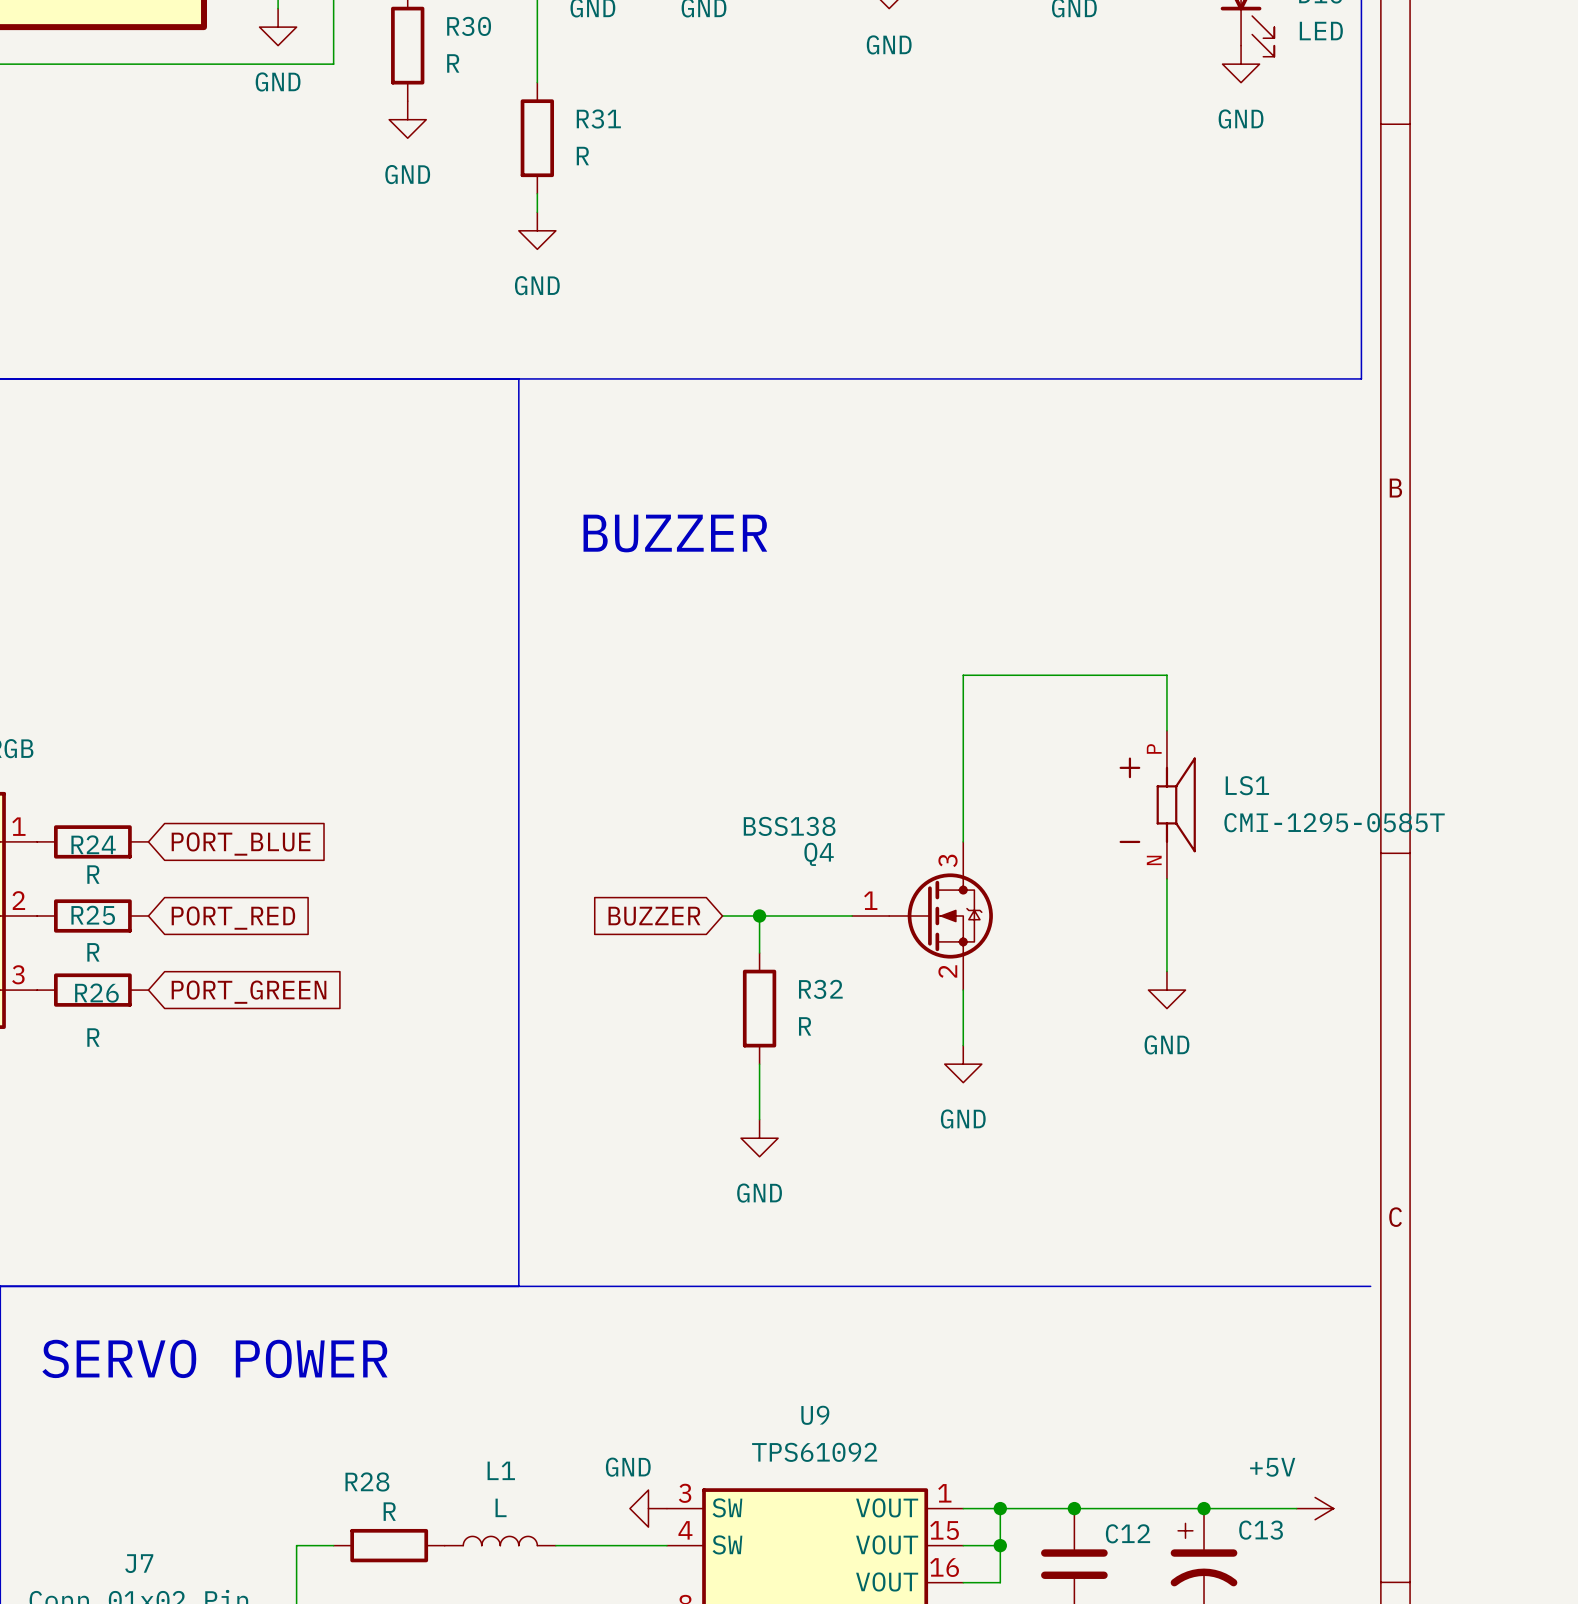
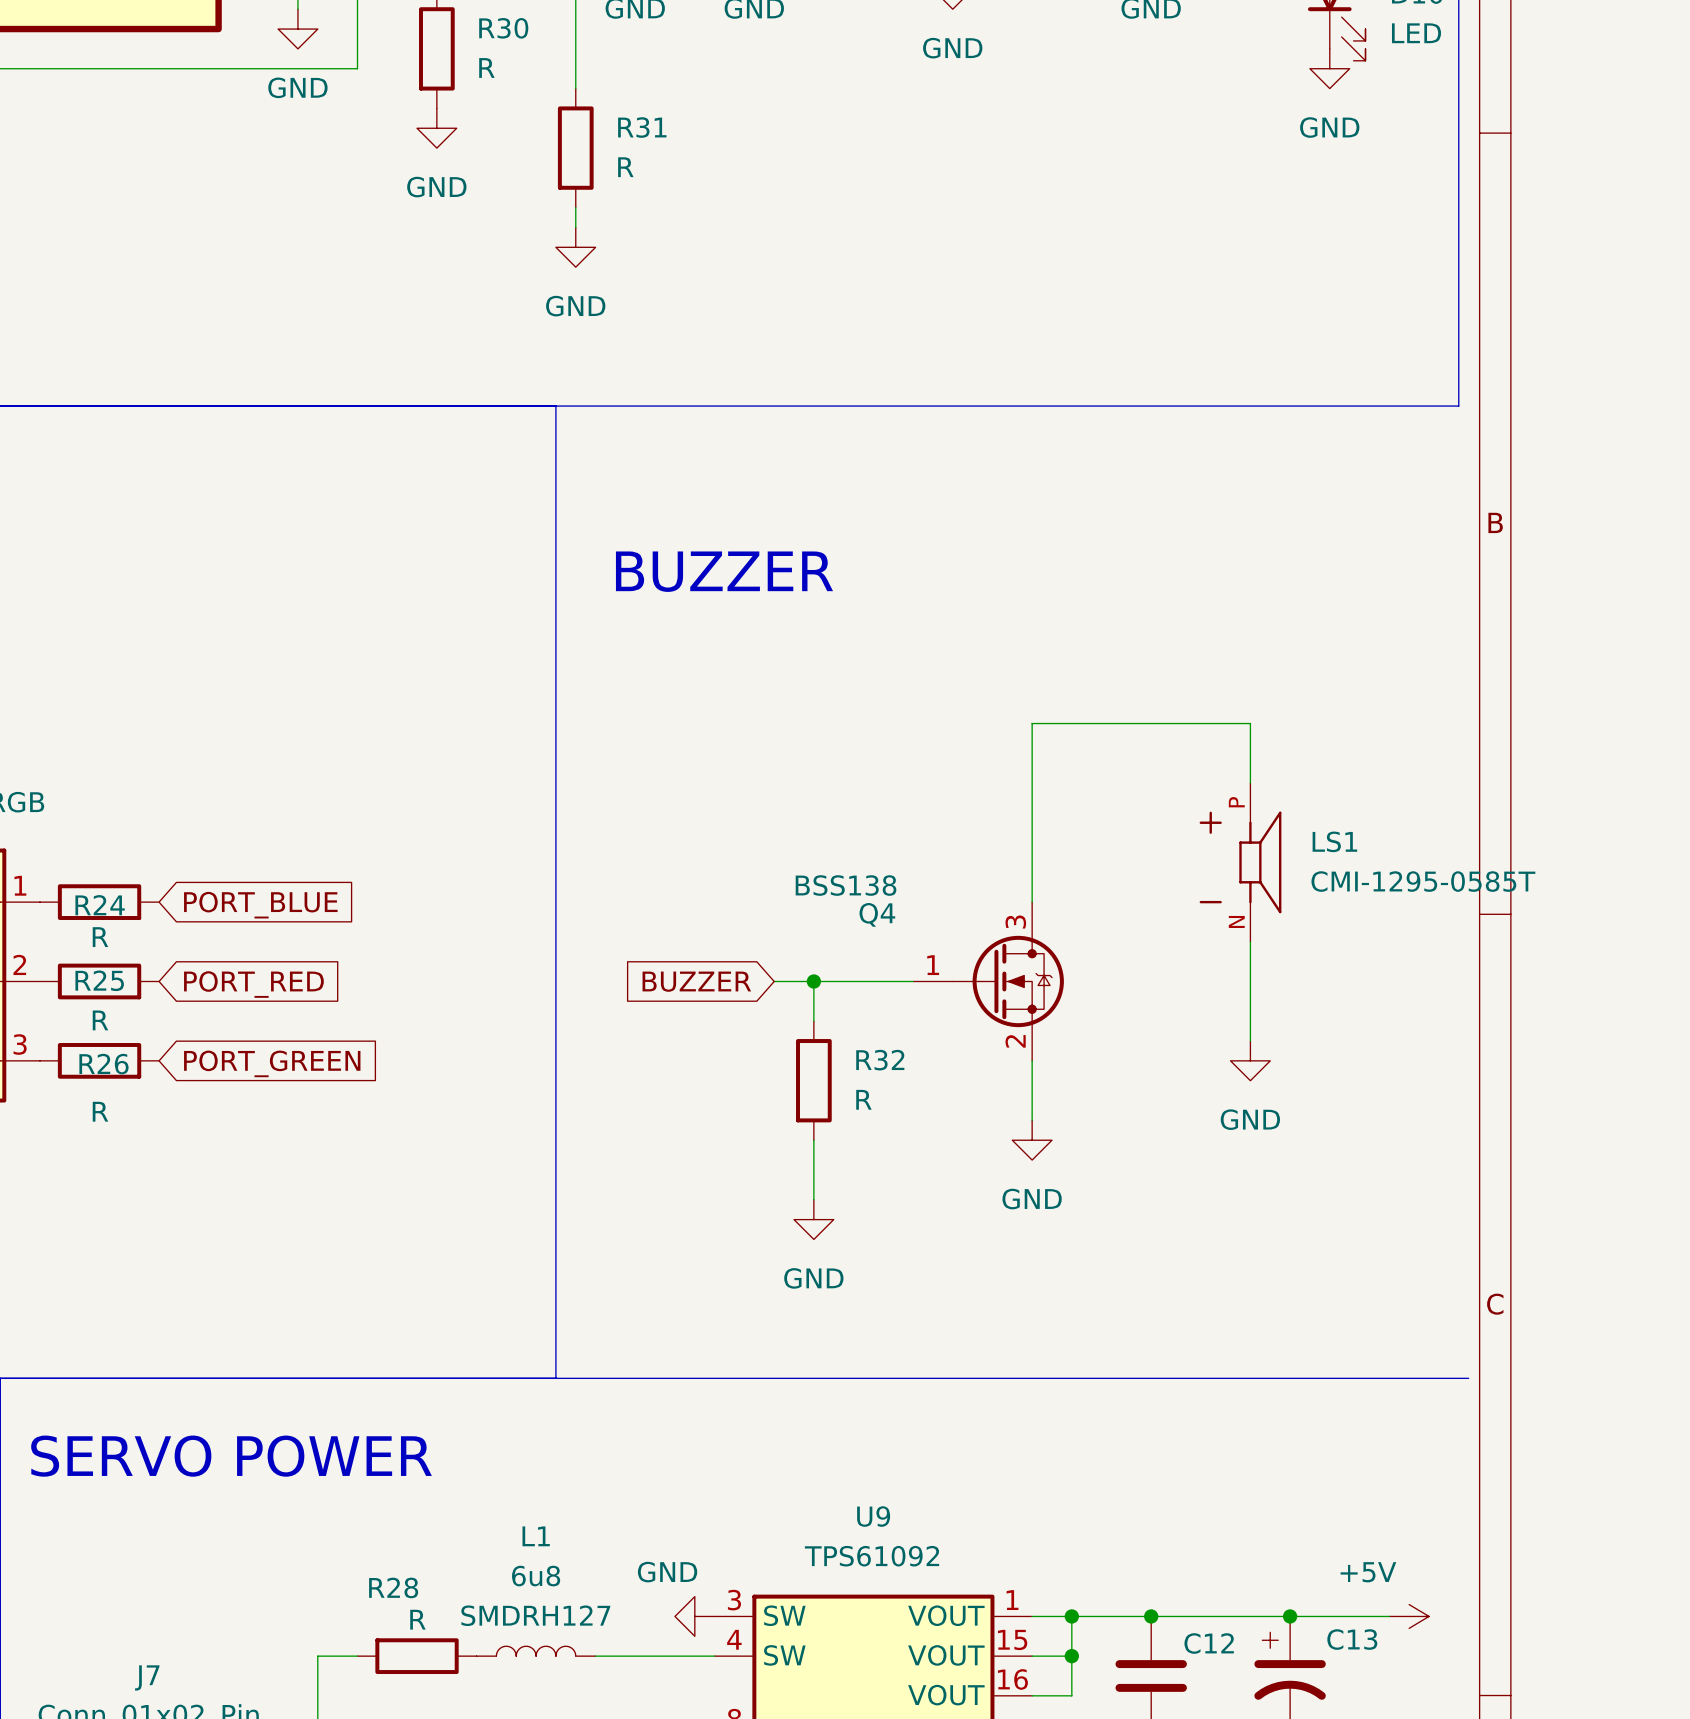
L1 name position: L1 (501, 1470) -> L1 (536, 1536)
L1 text: none -> SMDRH127 (535, 1615)
L1 value: L (501, 1507) -> 6u8 (536, 1576)

